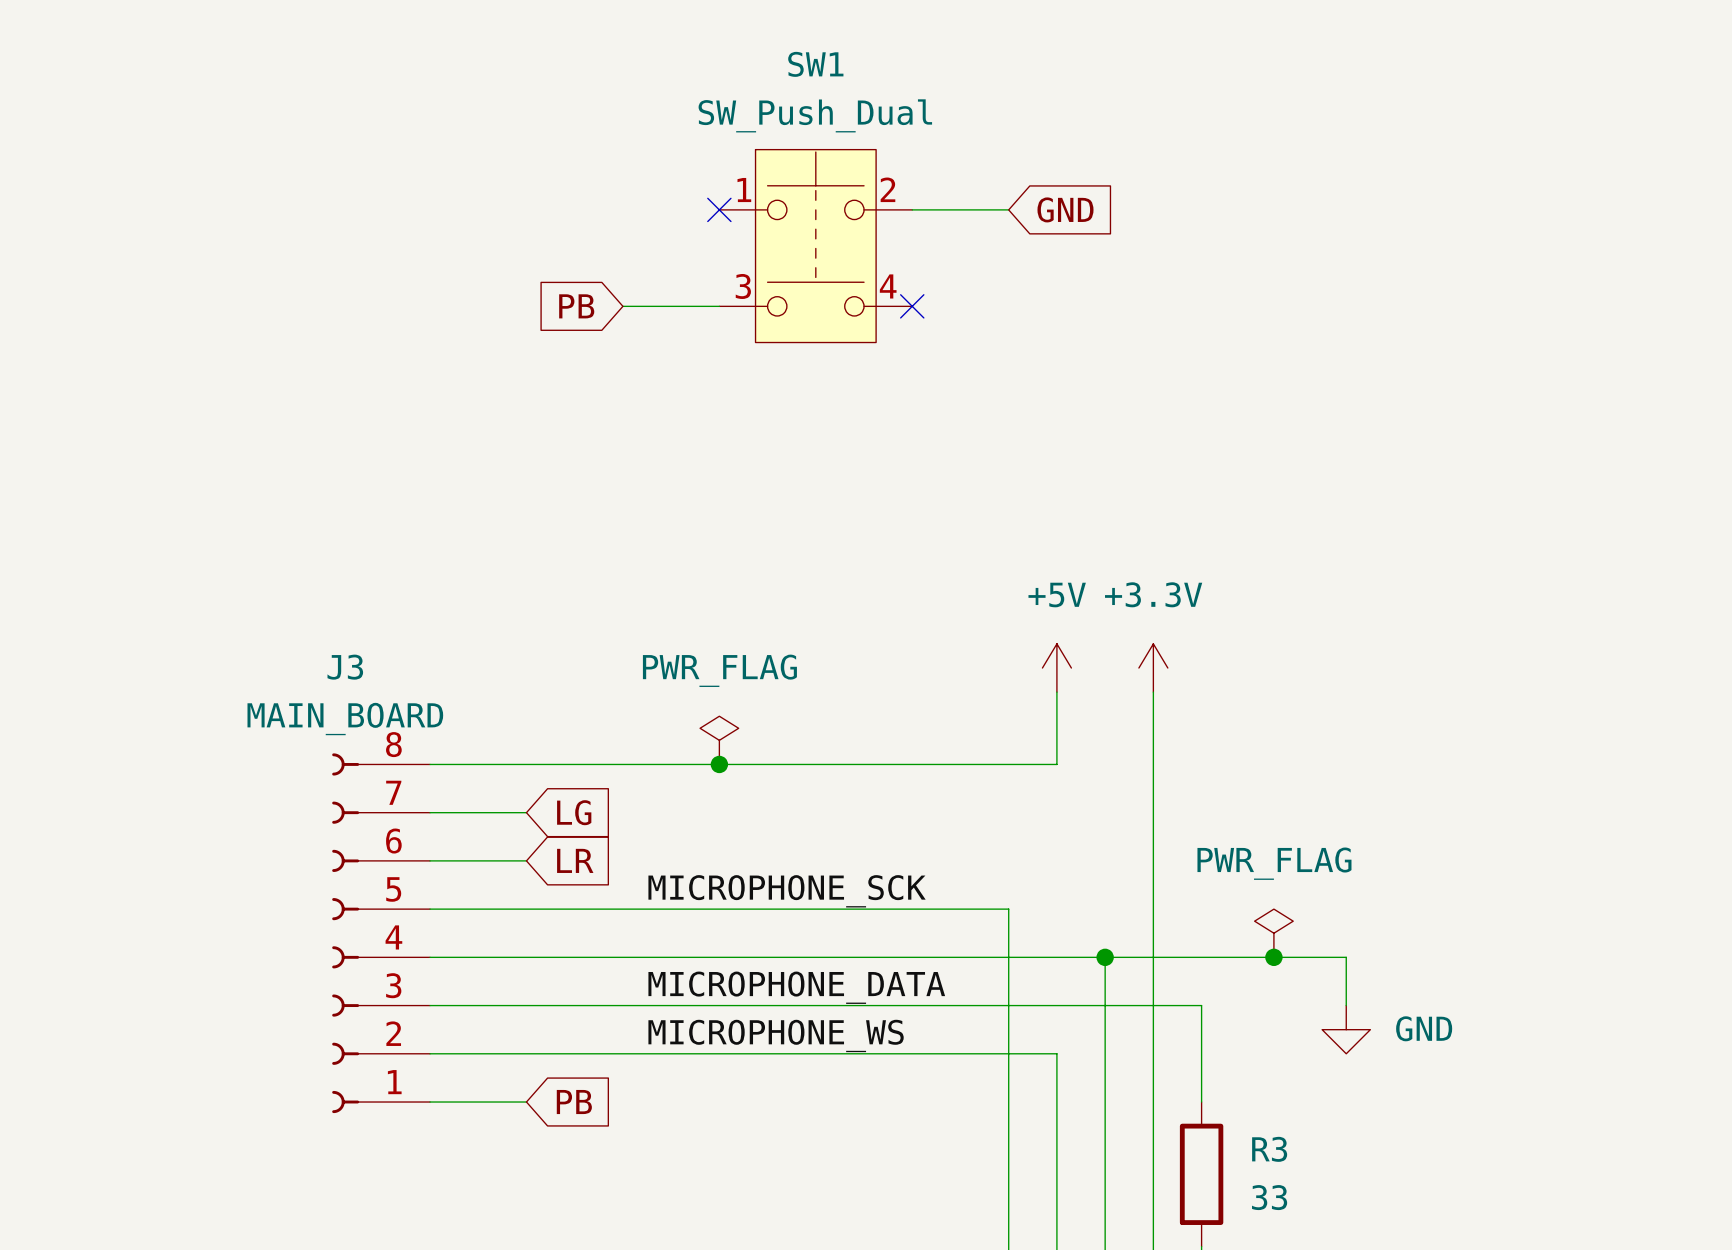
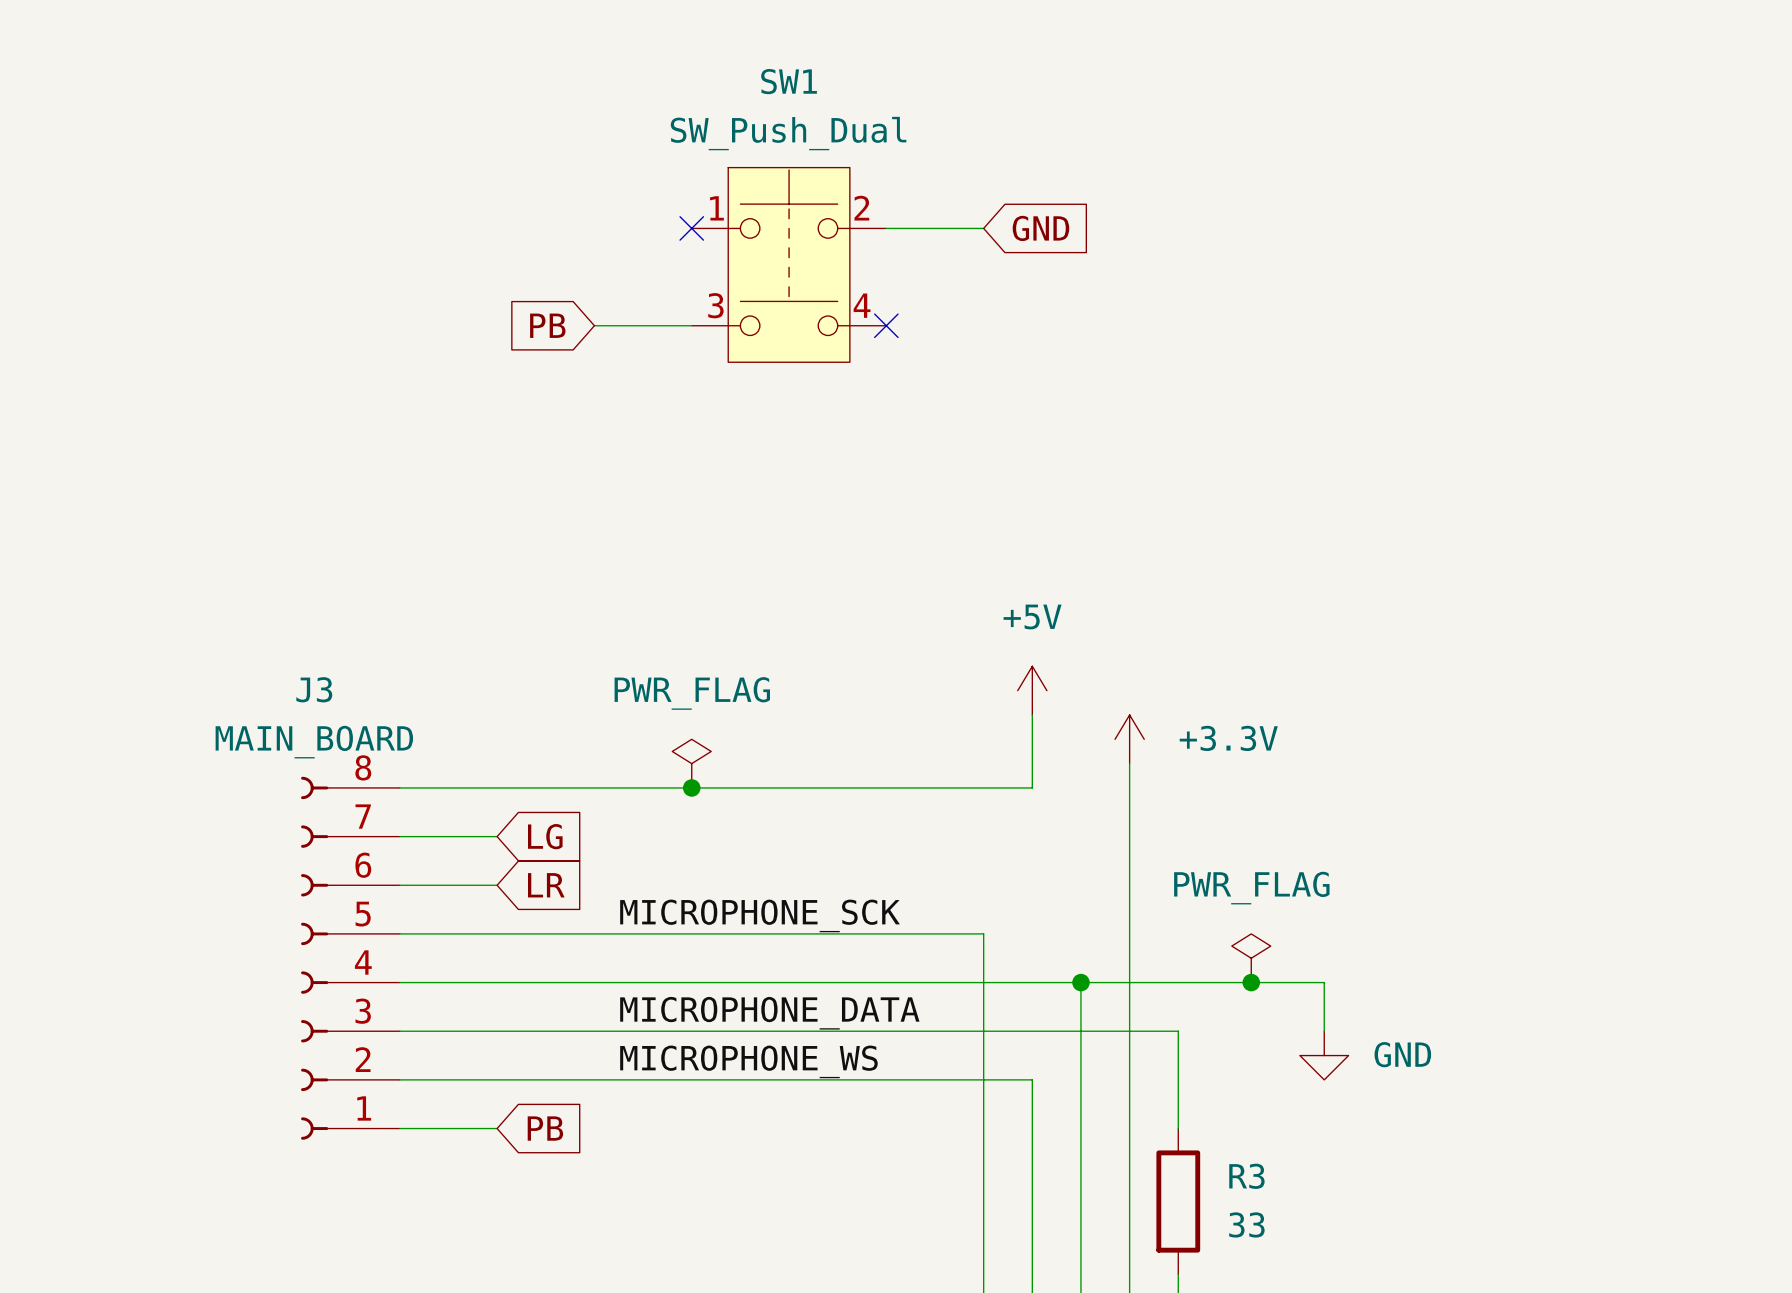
power symbol text position: +3.3V (1153, 594) -> +3.3V (1228, 738)
power symbol position: +3.3V (1153, 668) -> +3.3V (1129, 739)

